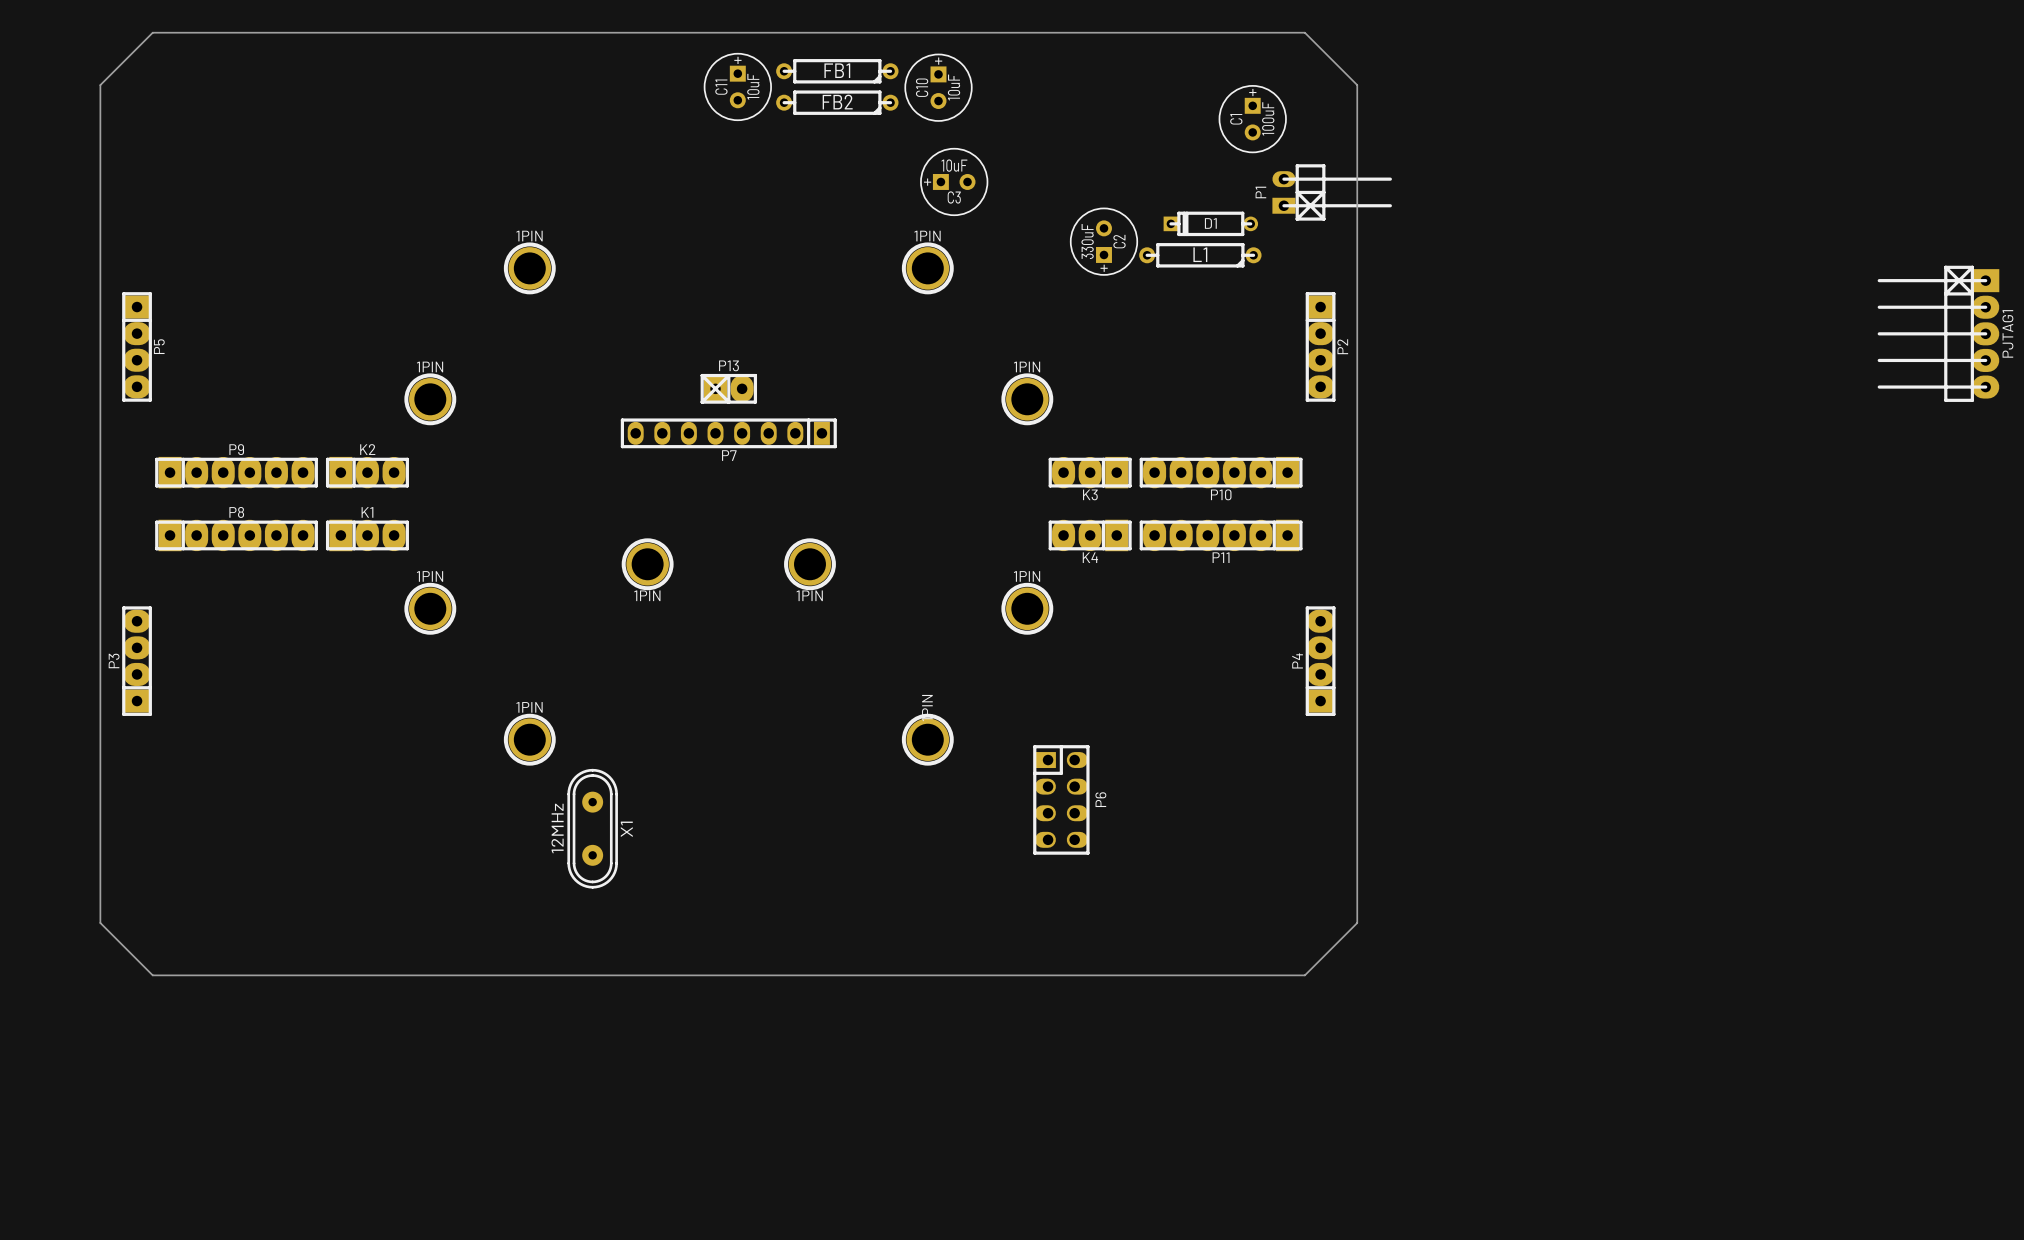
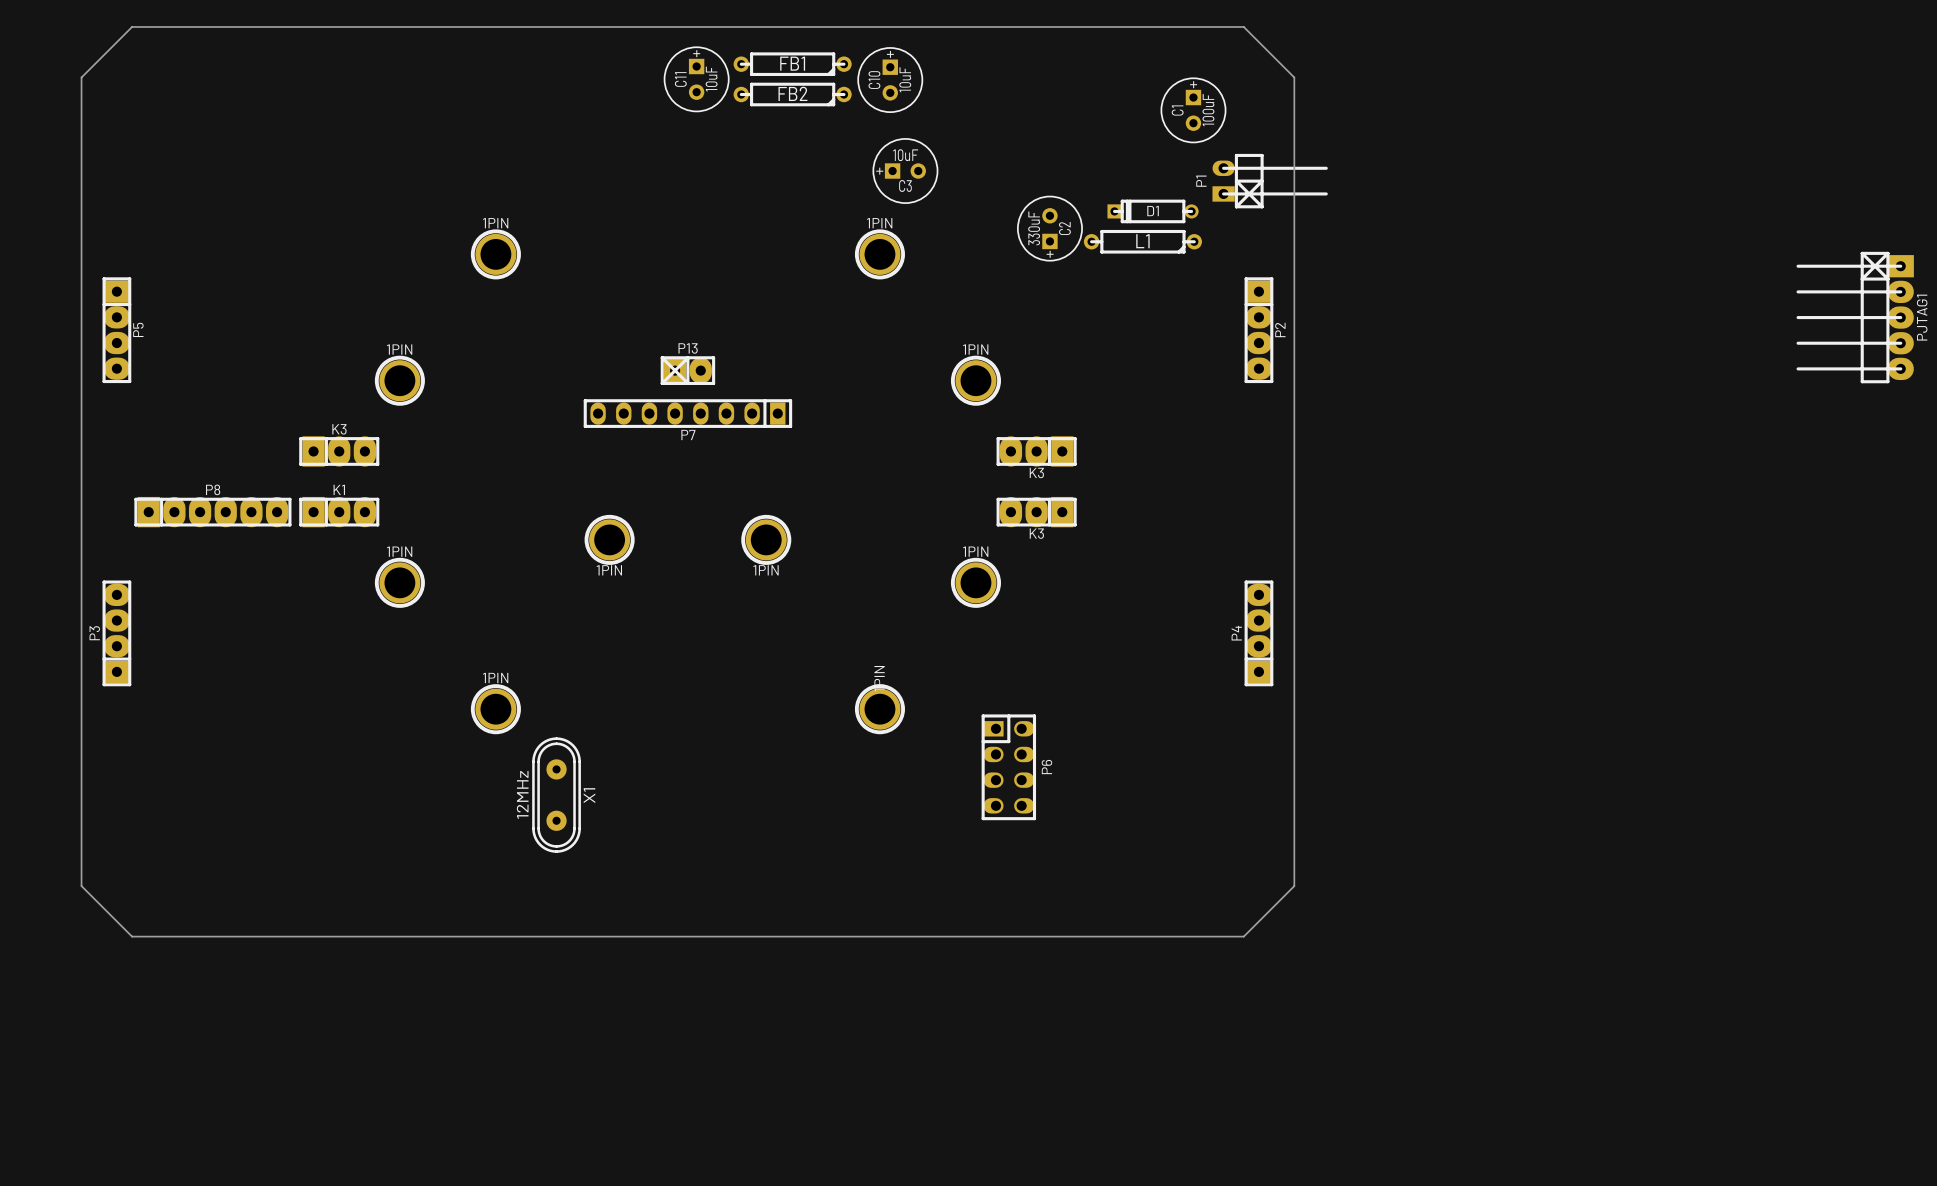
K2 name: K2 (367, 449) -> K3 (339, 429)
P9: (236, 472) -> none
P10: (1221, 472) -> none
P11: (1221, 535) -> none
K4 name: K4 (1090, 557) -> K3 (1036, 533)

